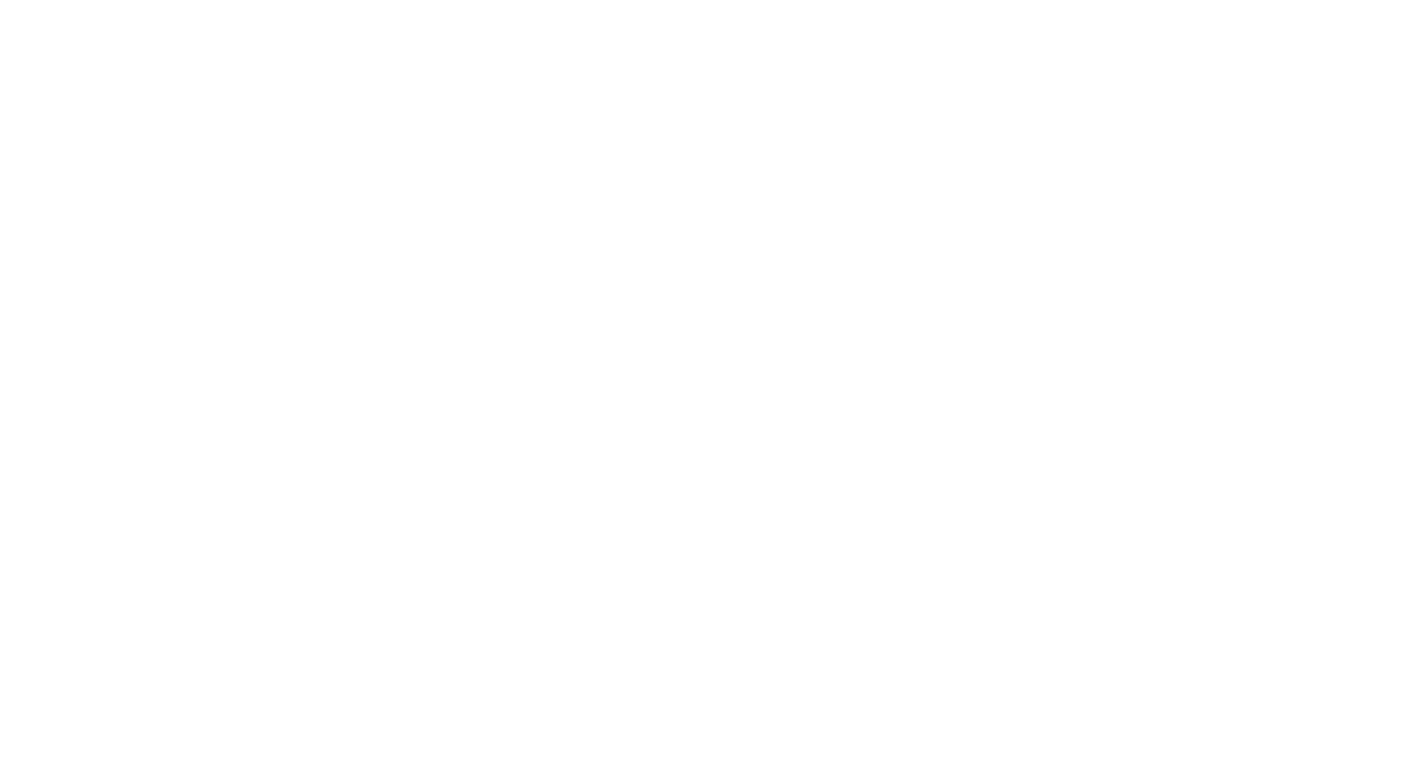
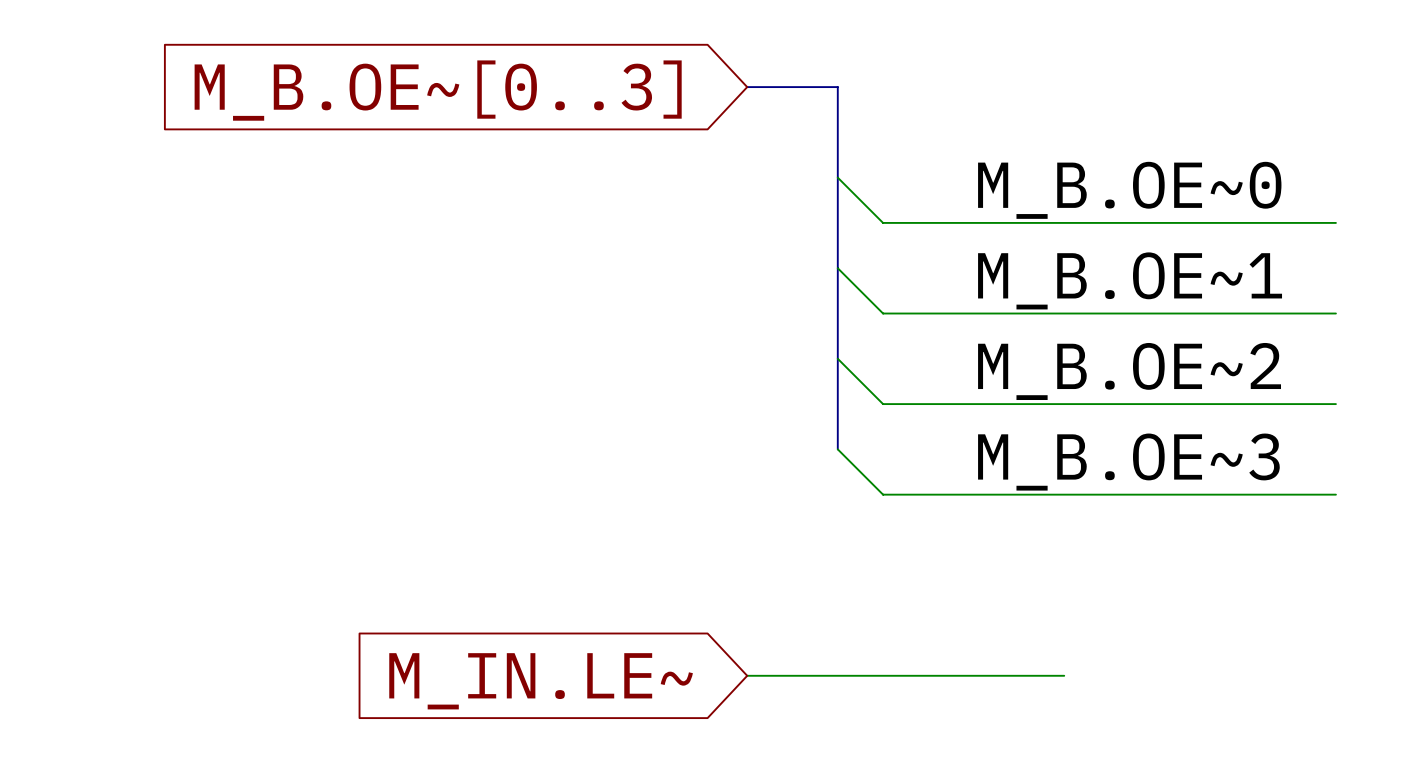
bus: none -> (747, 87) (837, 87) (837, 449)
global label: none -> M_B.OE~[0..3] (438, 90)
wire: none -> (837, 177) (883, 222) (1335, 222)
label: none -> M_B.OE~0 (1129, 190)
wire: none -> (837, 268) (883, 313) (1335, 313)
label: none -> M_B.OE~1 (1130, 280)
wire: none -> (837, 358) (883, 404) (1335, 404)
label: none -> M_B.OE~2 (1129, 371)
wire: none -> (837, 449) (883, 494) (1335, 494)
label: none -> M_B.OE~3 (1128, 462)
wire: none -> (747, 675) (1064, 675)
global label: none -> M_IN.LE~ (541, 681)

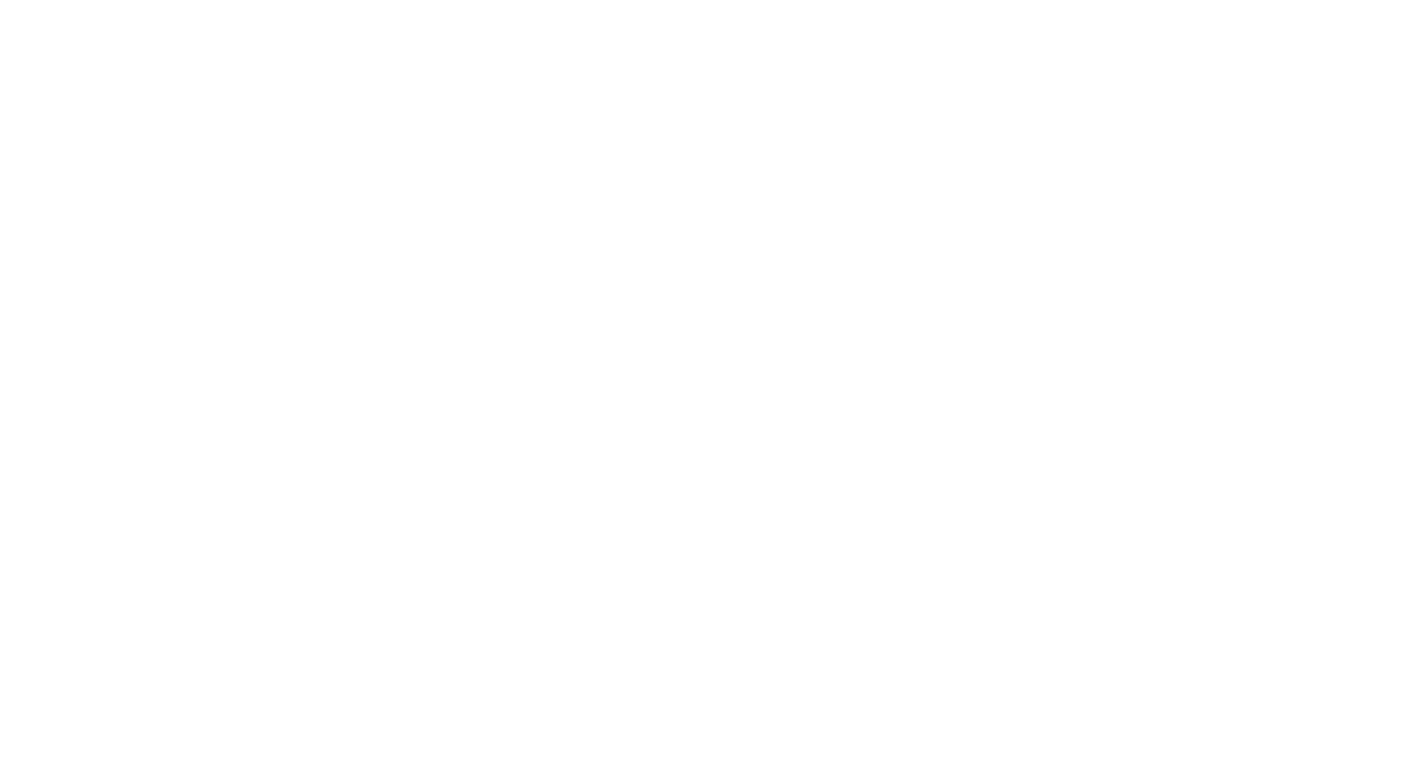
bus: (747, 87) (837, 87) (837, 449) -> none
global label: M_B.OE~[0..3] (438, 90) -> none
wire: (837, 177) (883, 222) (1335, 222) -> none
label: M_B.OE~0 (1129, 190) -> none
wire: (837, 268) (883, 313) (1335, 313) -> none
label: M_B.OE~1 (1130, 280) -> none
wire: (837, 358) (883, 404) (1335, 404) -> none
label: M_B.OE~2 (1129, 371) -> none
wire: (837, 449) (883, 494) (1335, 494) -> none
label: M_B.OE~3 (1128, 462) -> none
wire: (747, 675) (1064, 675) -> none
global label: M_IN.LE~ (541, 681) -> none

